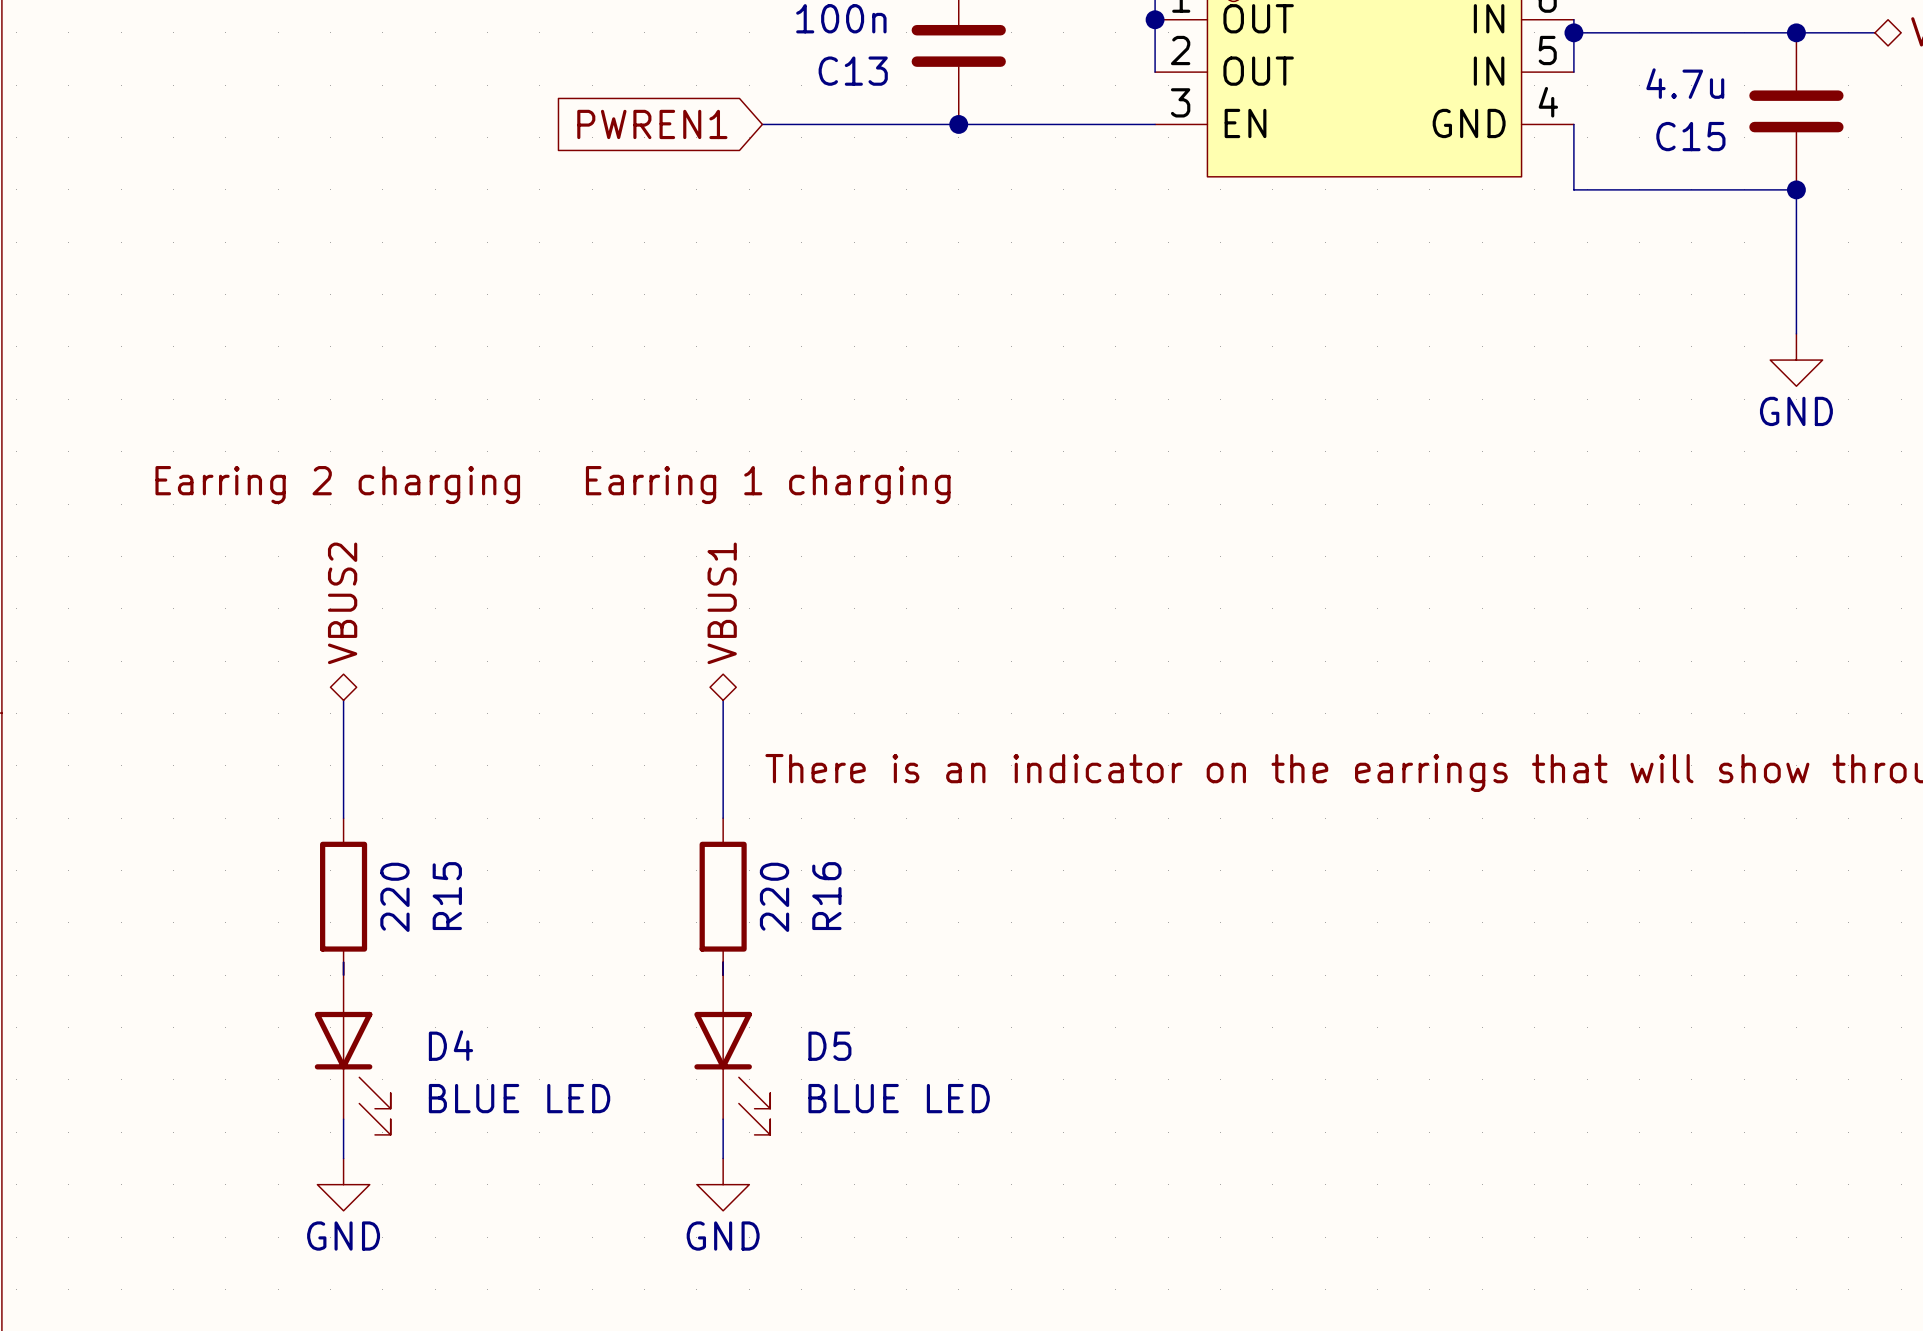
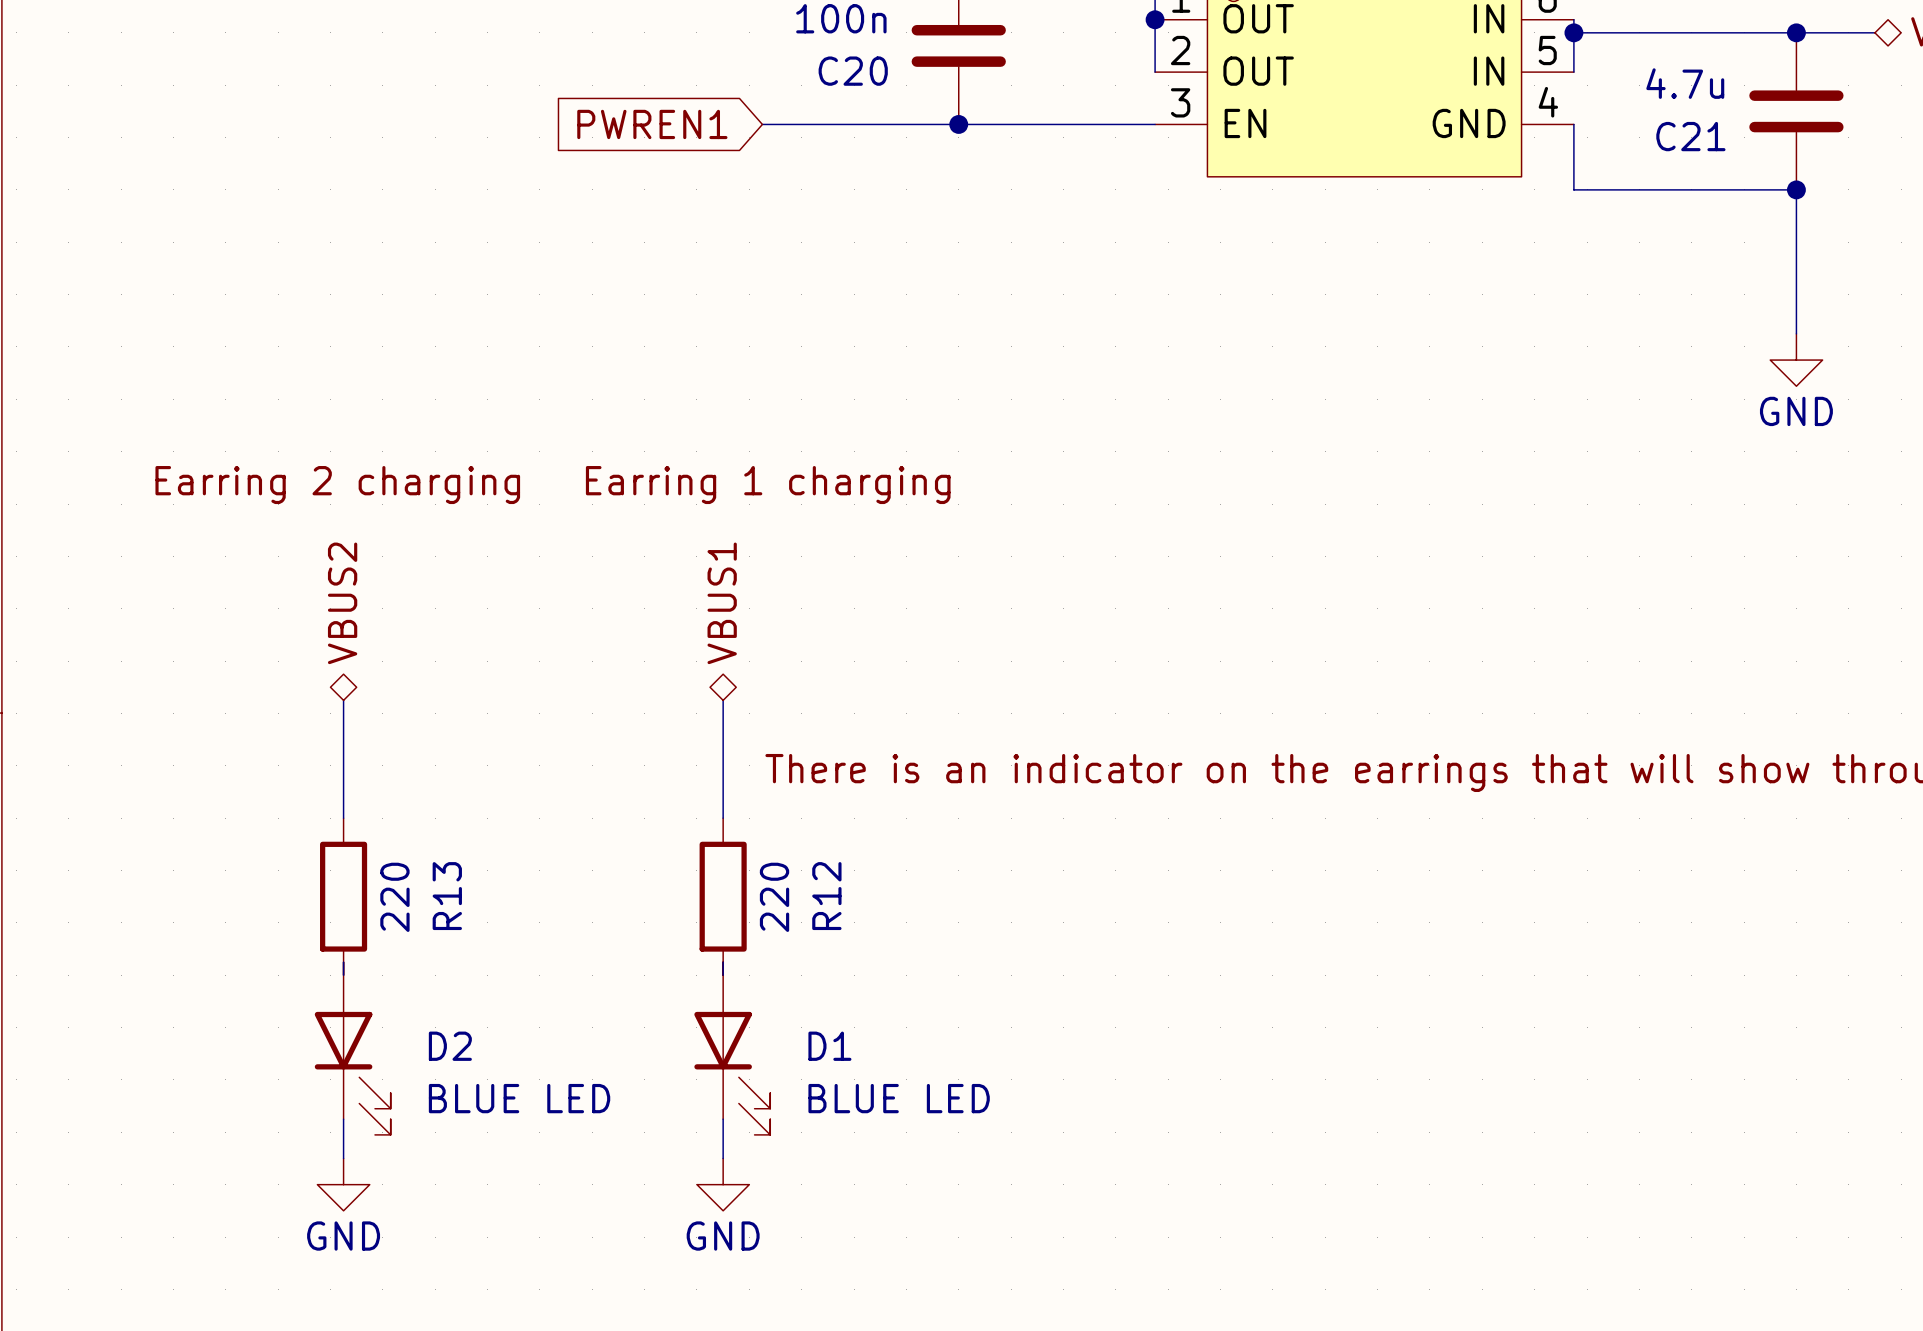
C13 name: C13 (853, 71) -> C20 (853, 71)
C15 name: C15 (1690, 136) -> C21 (1690, 136)
R15 name: R15 (447, 896) -> R13 (447, 896)
R16 name: R16 (826, 896) -> R12 (826, 896)
D4 name: D4 (450, 1045) -> D2 (450, 1046)
D5 name: D5 (829, 1046) -> D1 (829, 1046)

